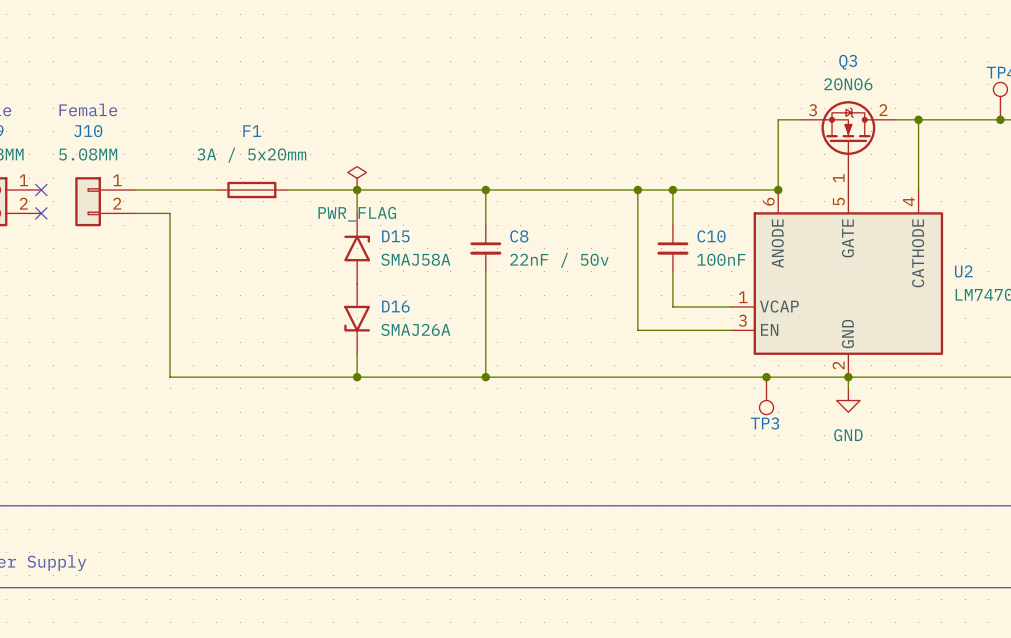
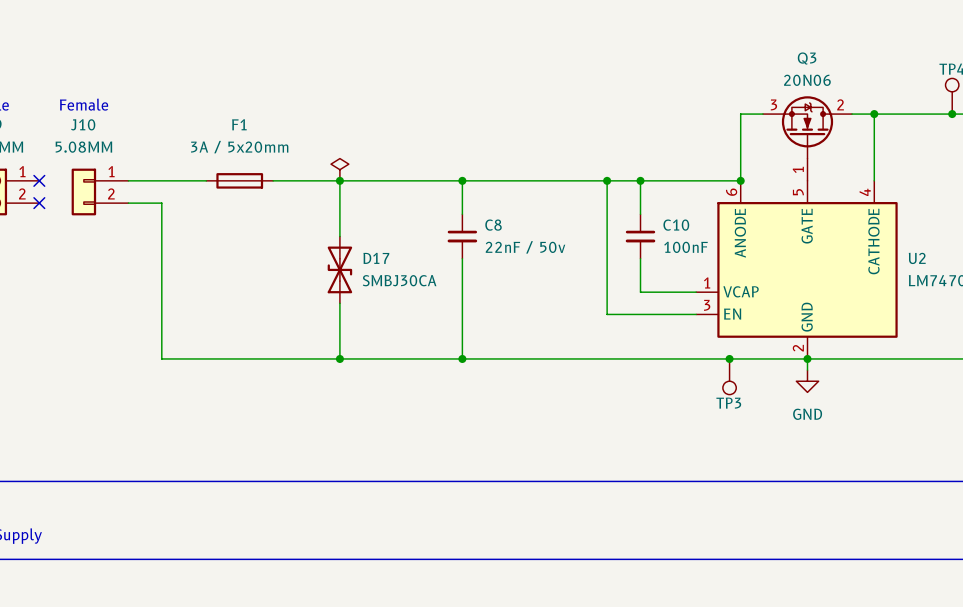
power symbol text: PWR_FLAG (357, 214) -> none
D15: SMAJ58A (357, 248) -> none
D17: none -> SMBJ30CA (339, 269)
D16: SMAJ26A (357, 318) -> none

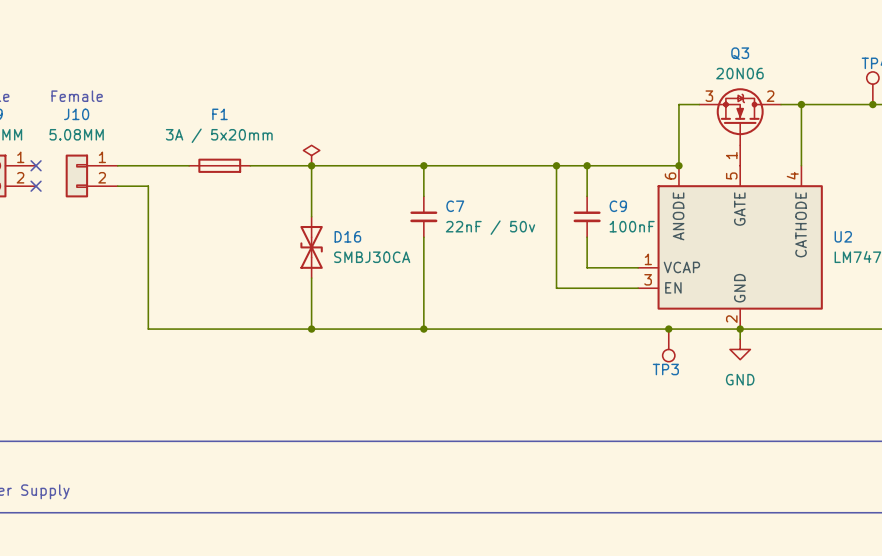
C8 name: C8 (493, 225) -> C7 (455, 206)
C10 name: C10 (676, 225) -> C9 (618, 206)
D17 name: D17 (376, 258) -> D16 (347, 236)

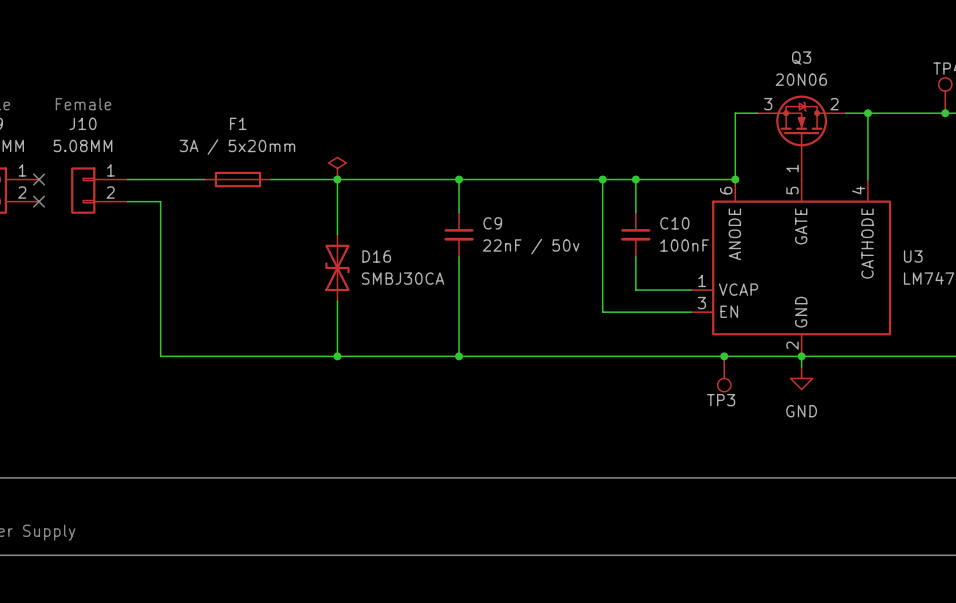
C7 name: C7 (455, 206) -> C9 (492, 223)
C9 name: C9 (618, 206) -> C10 (674, 223)
U2 name: U2 (843, 236) -> U3 (913, 256)

